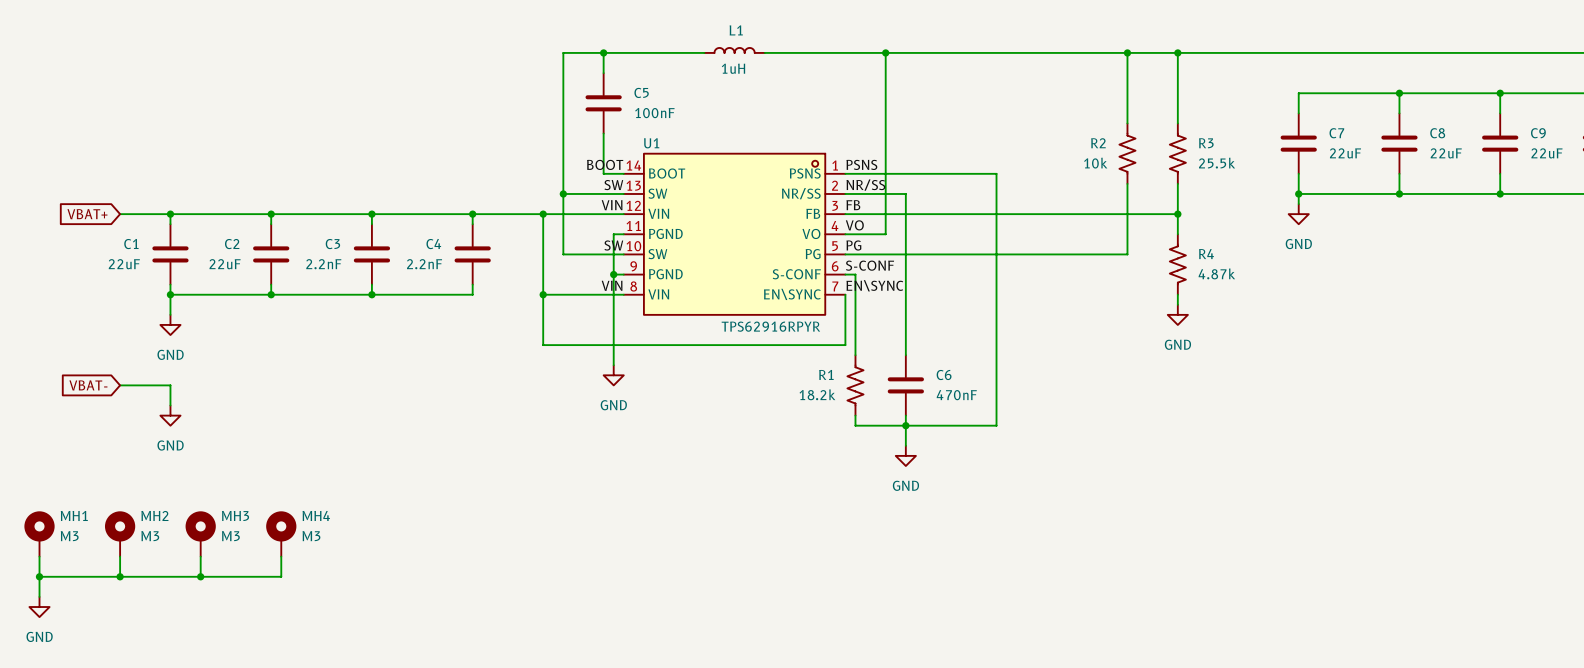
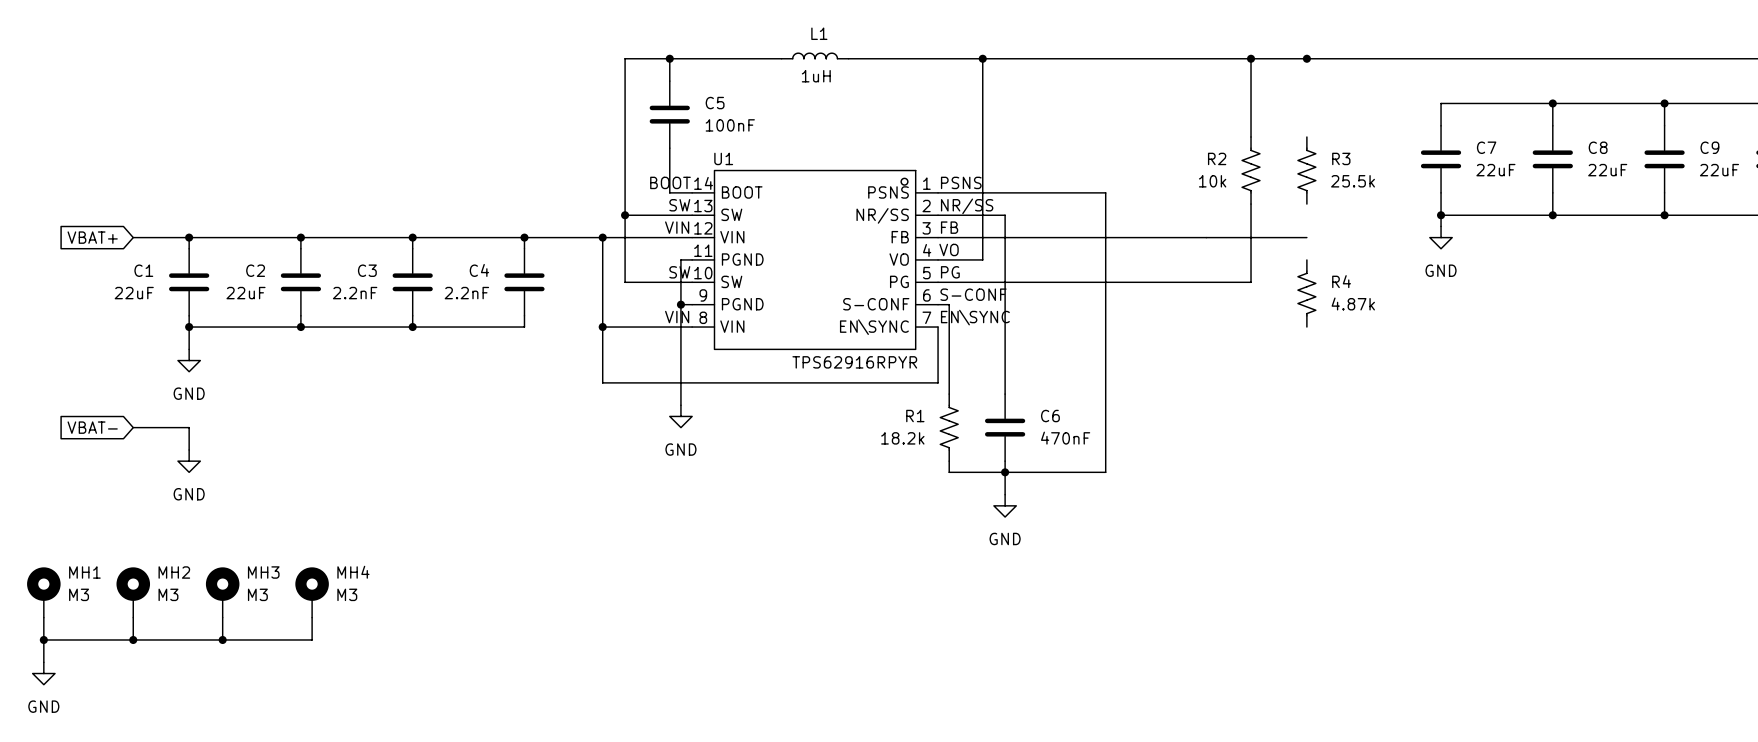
wire: (1177, 52) (1177, 123) -> none
wire: (1177, 183) (1177, 234) -> none
junction: (1177, 214) -> none
wire: (1177, 294) (1177, 304) -> none
power symbol: GND (1177, 314) -> none

